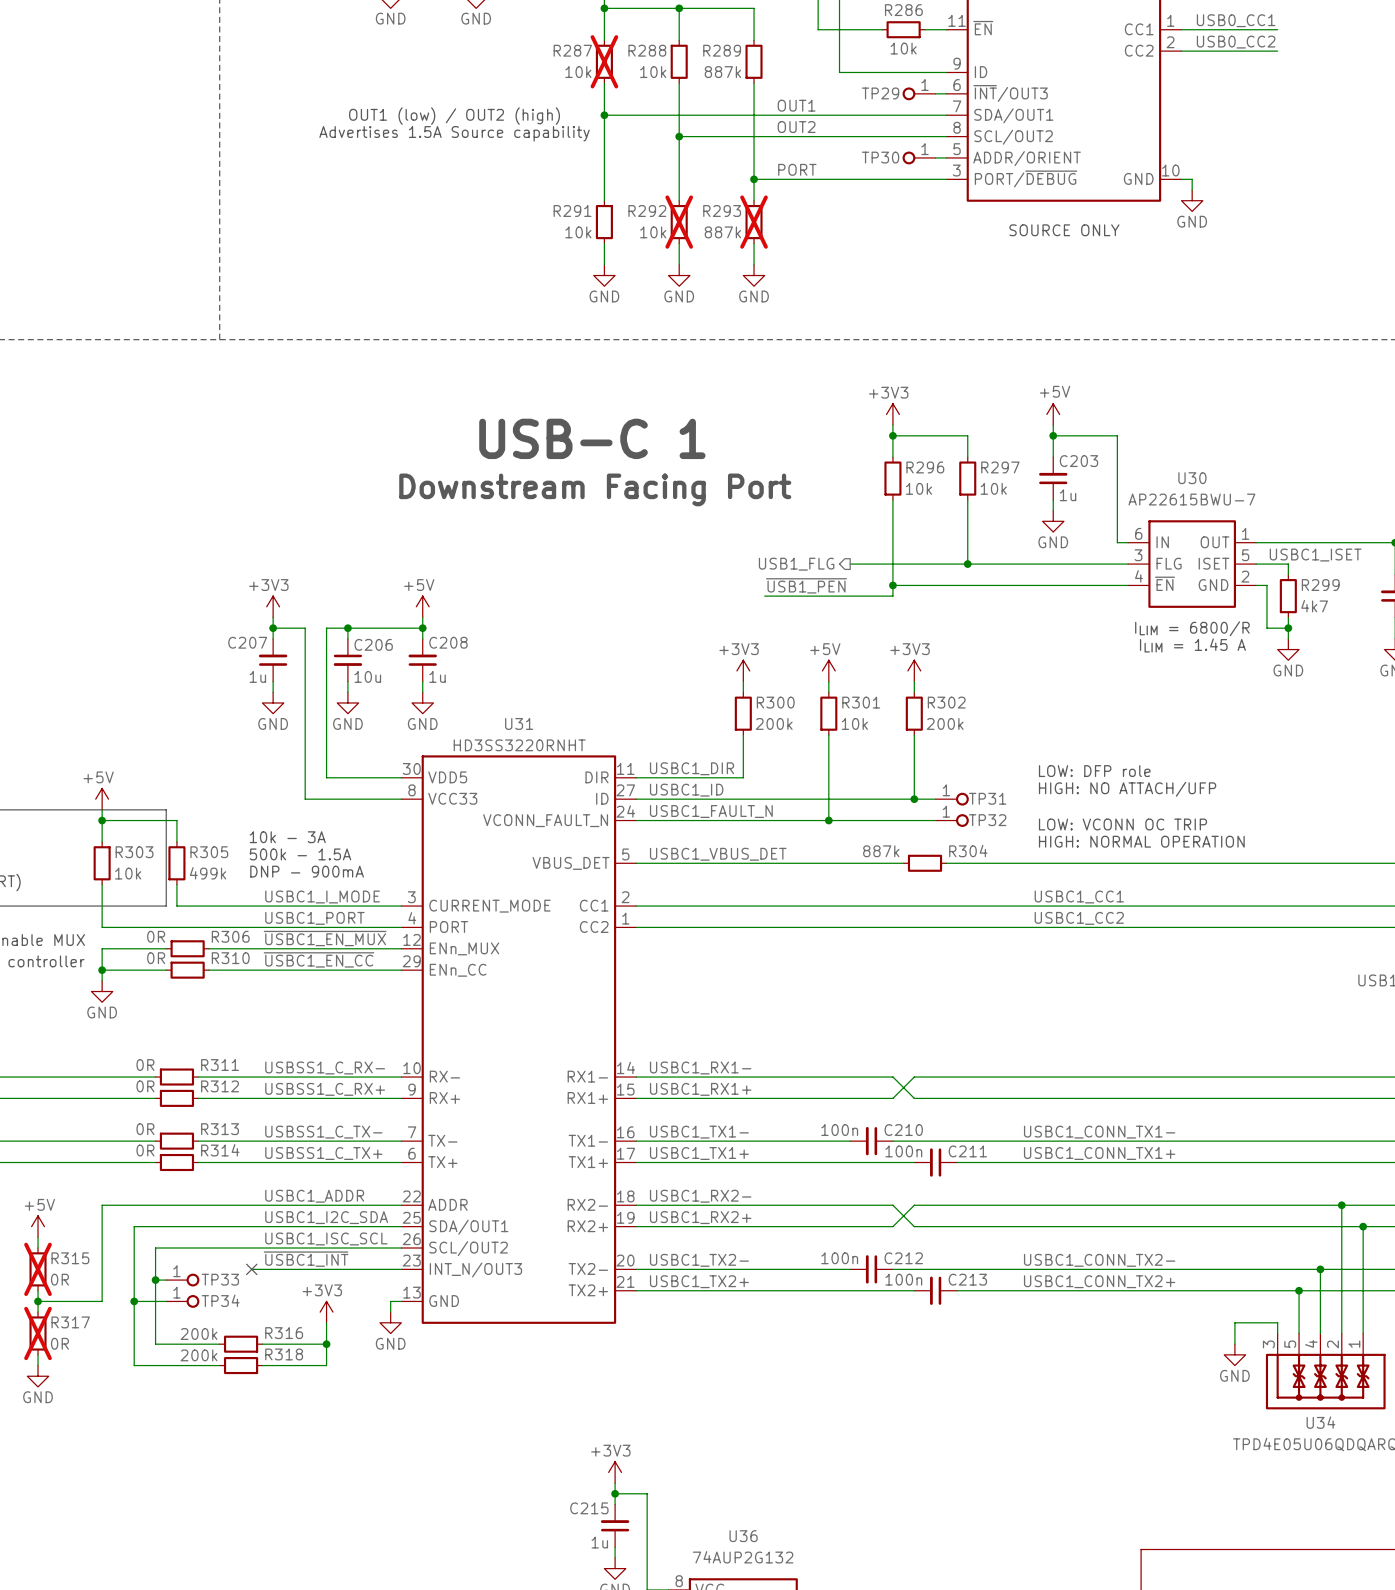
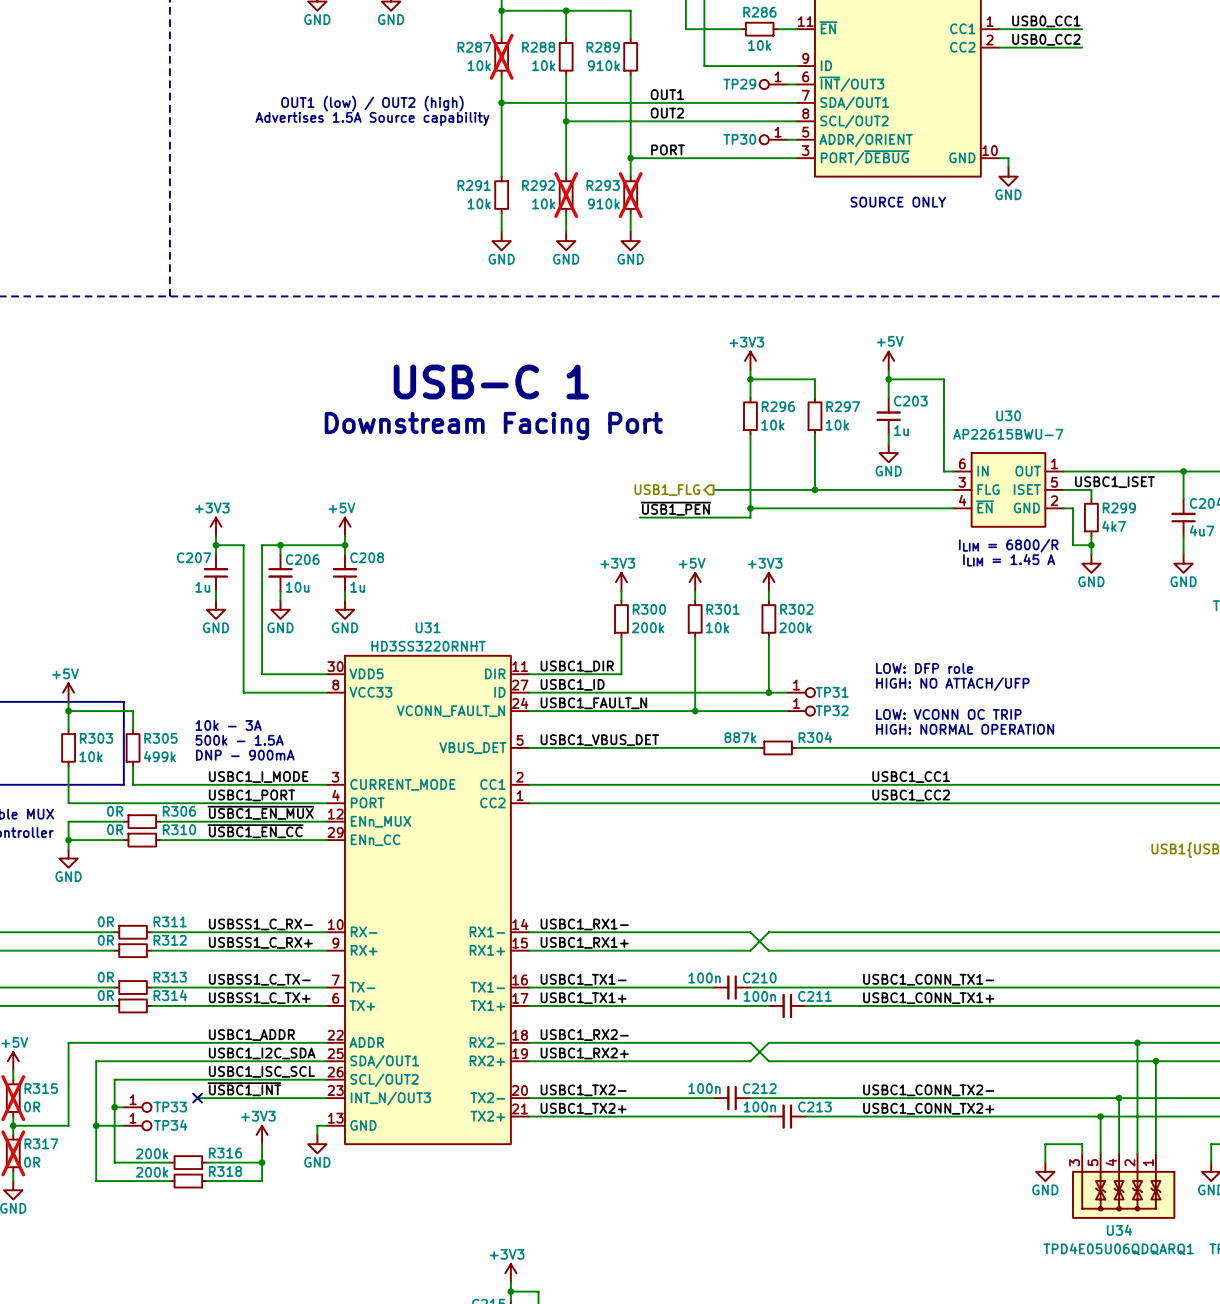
R289 text: 887k (722, 72) -> 910k (603, 65)
R293 text: 887k (722, 232) -> 910k (603, 203)

